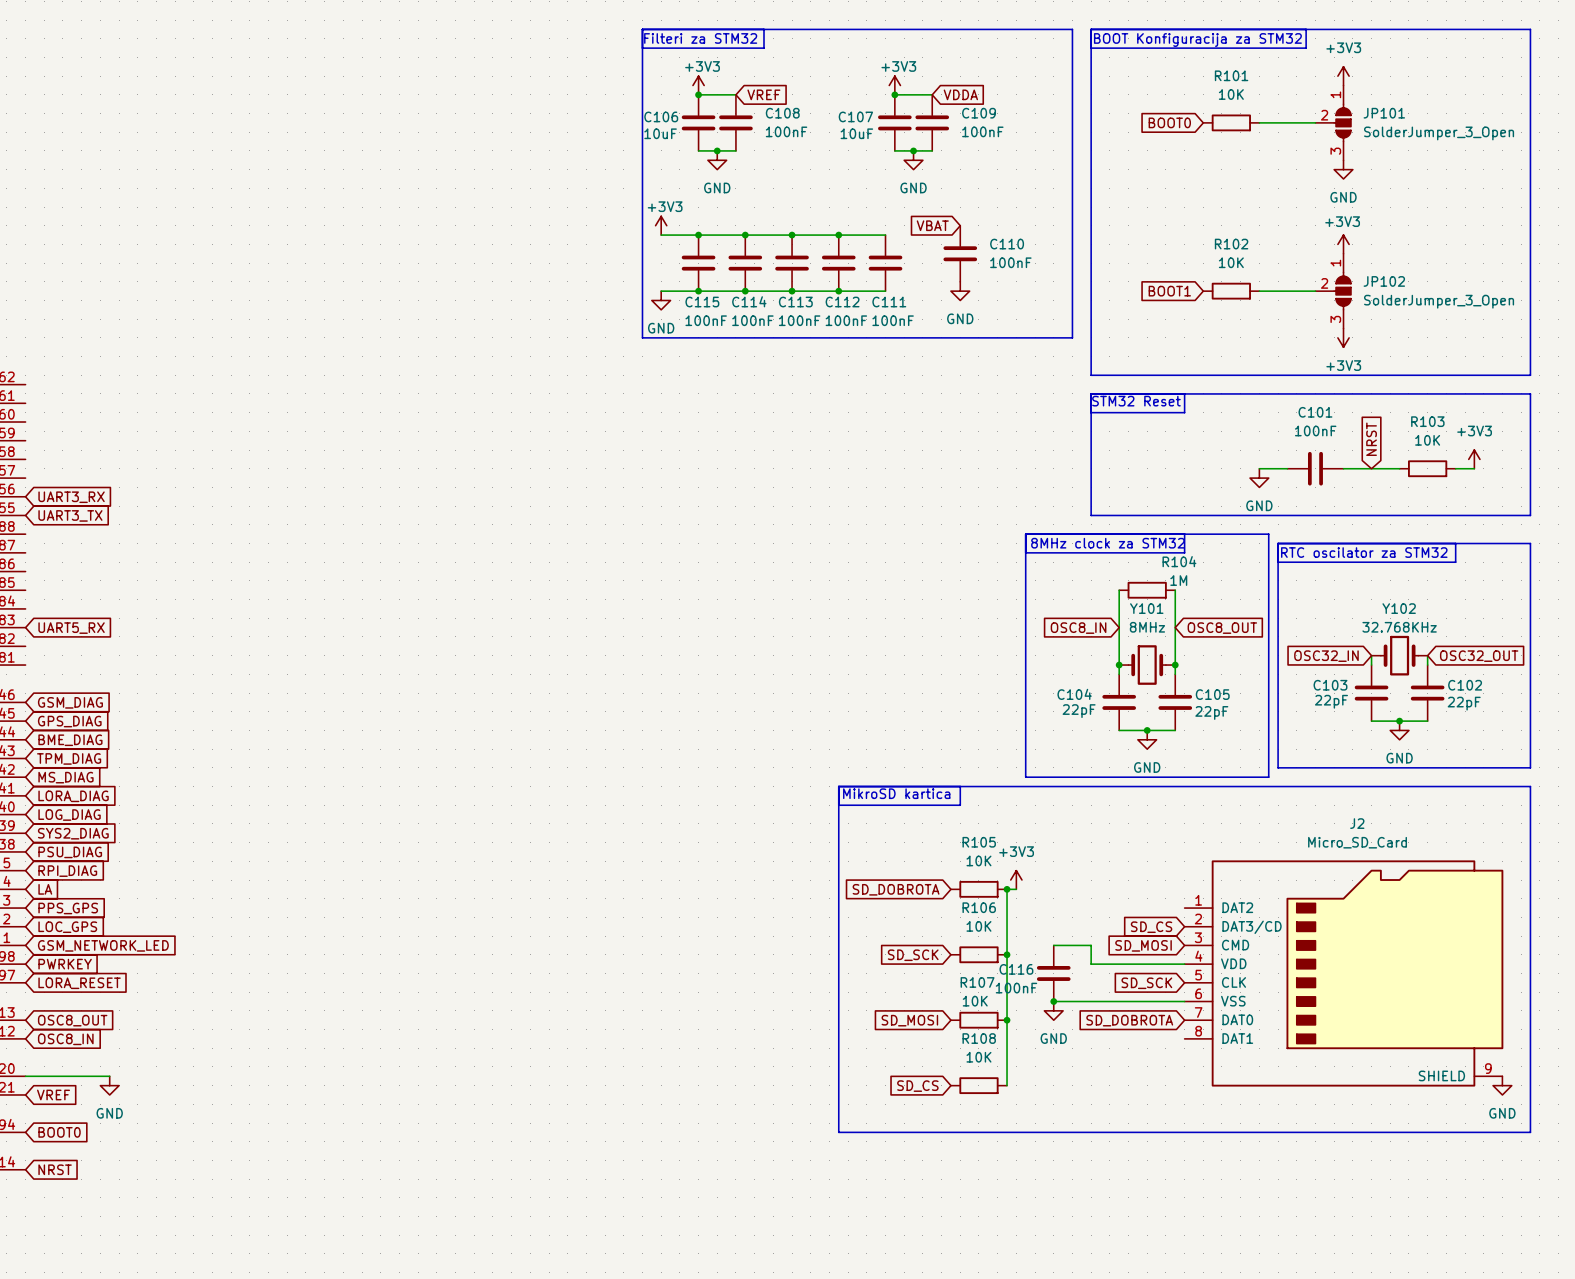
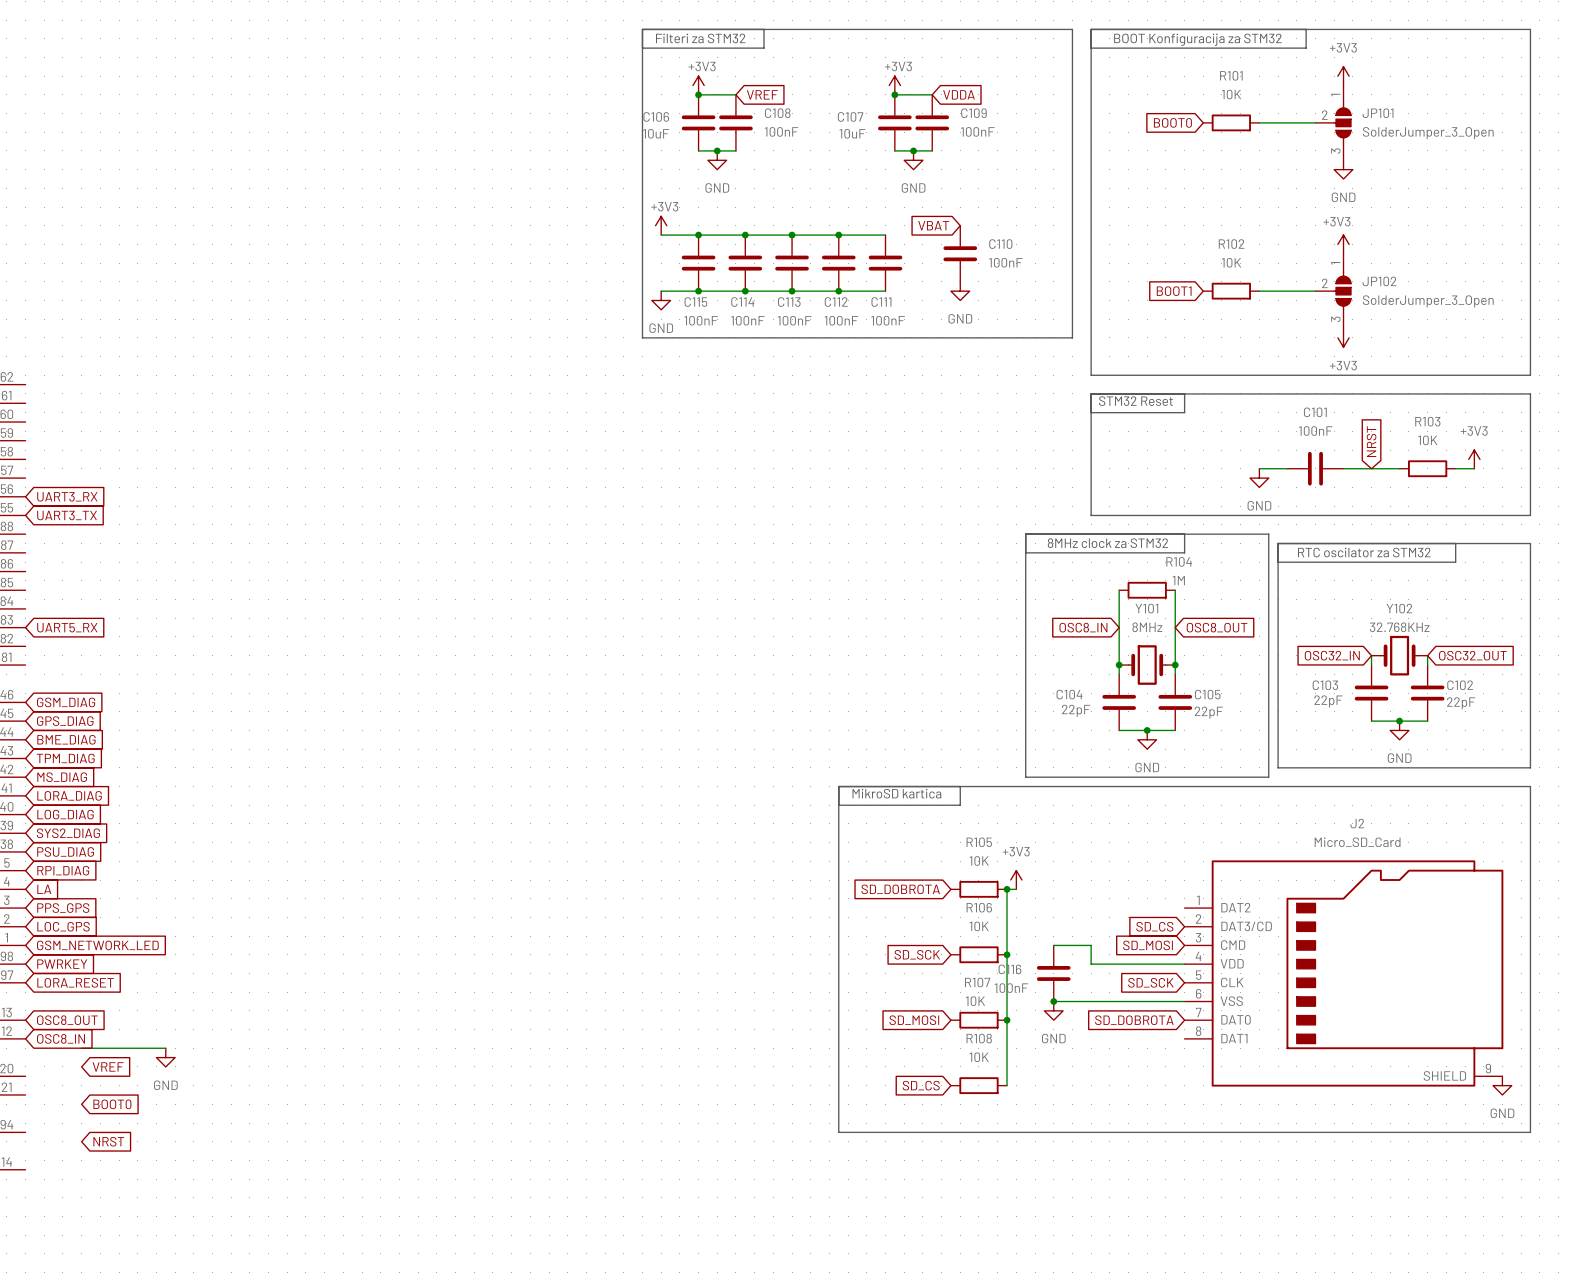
wire: (25, 1076) (109, 1076) -> (81, 1048) (165, 1048)
power symbol position: GND (109, 1085) -> GND (165, 1057)
global label position: VREF (53, 1094) -> VREF (108, 1066)
global label position: BOOT0 (59, 1132) -> BOOT0 (112, 1104)
global label position: NRST (55, 1169) -> NRST (108, 1141)

